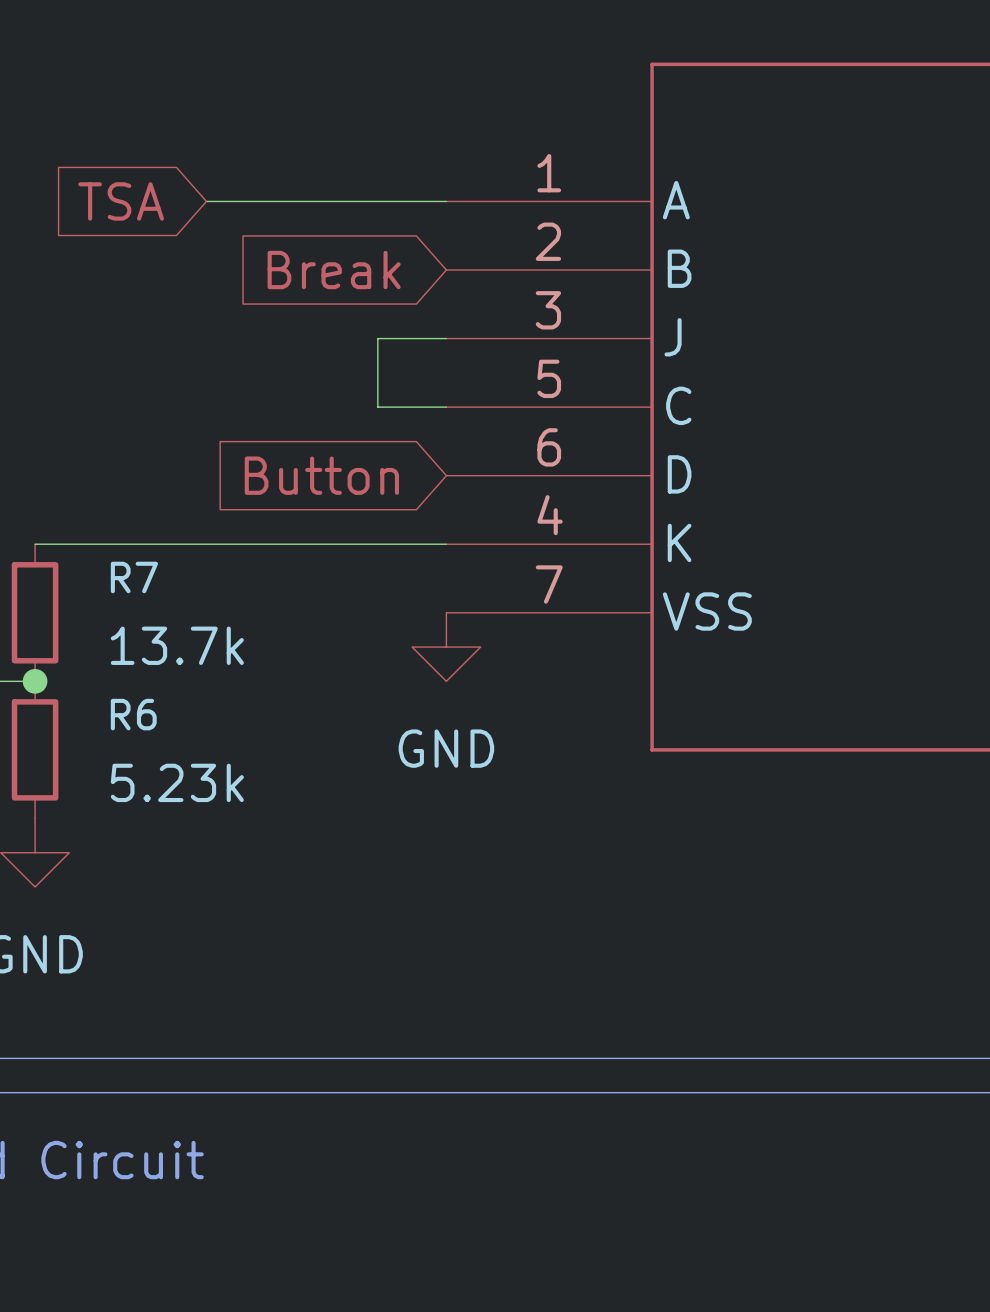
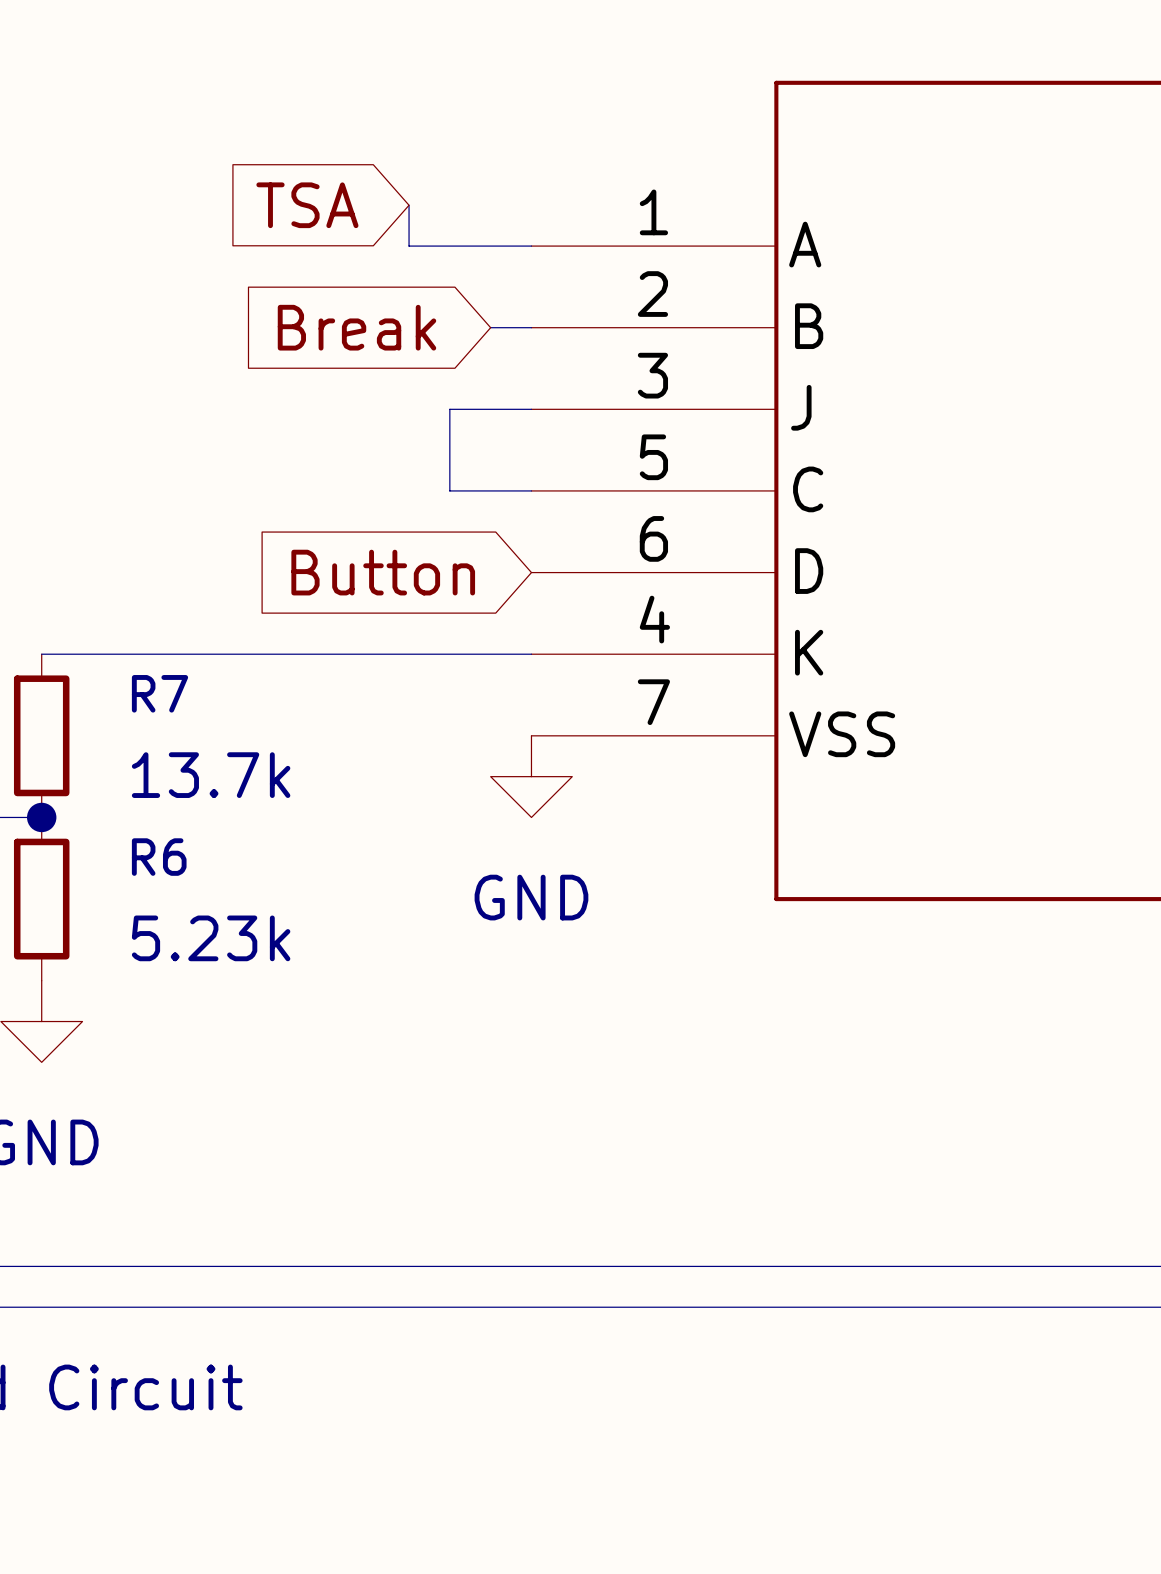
global label position: TSA (121, 201) -> TSA (307, 205)
wire: (206, 201) (343, 201) -> (409, 205) (409, 246)
global label position: Break (334, 270) -> Break (356, 327)
wire: none -> (490, 327) (531, 327)

